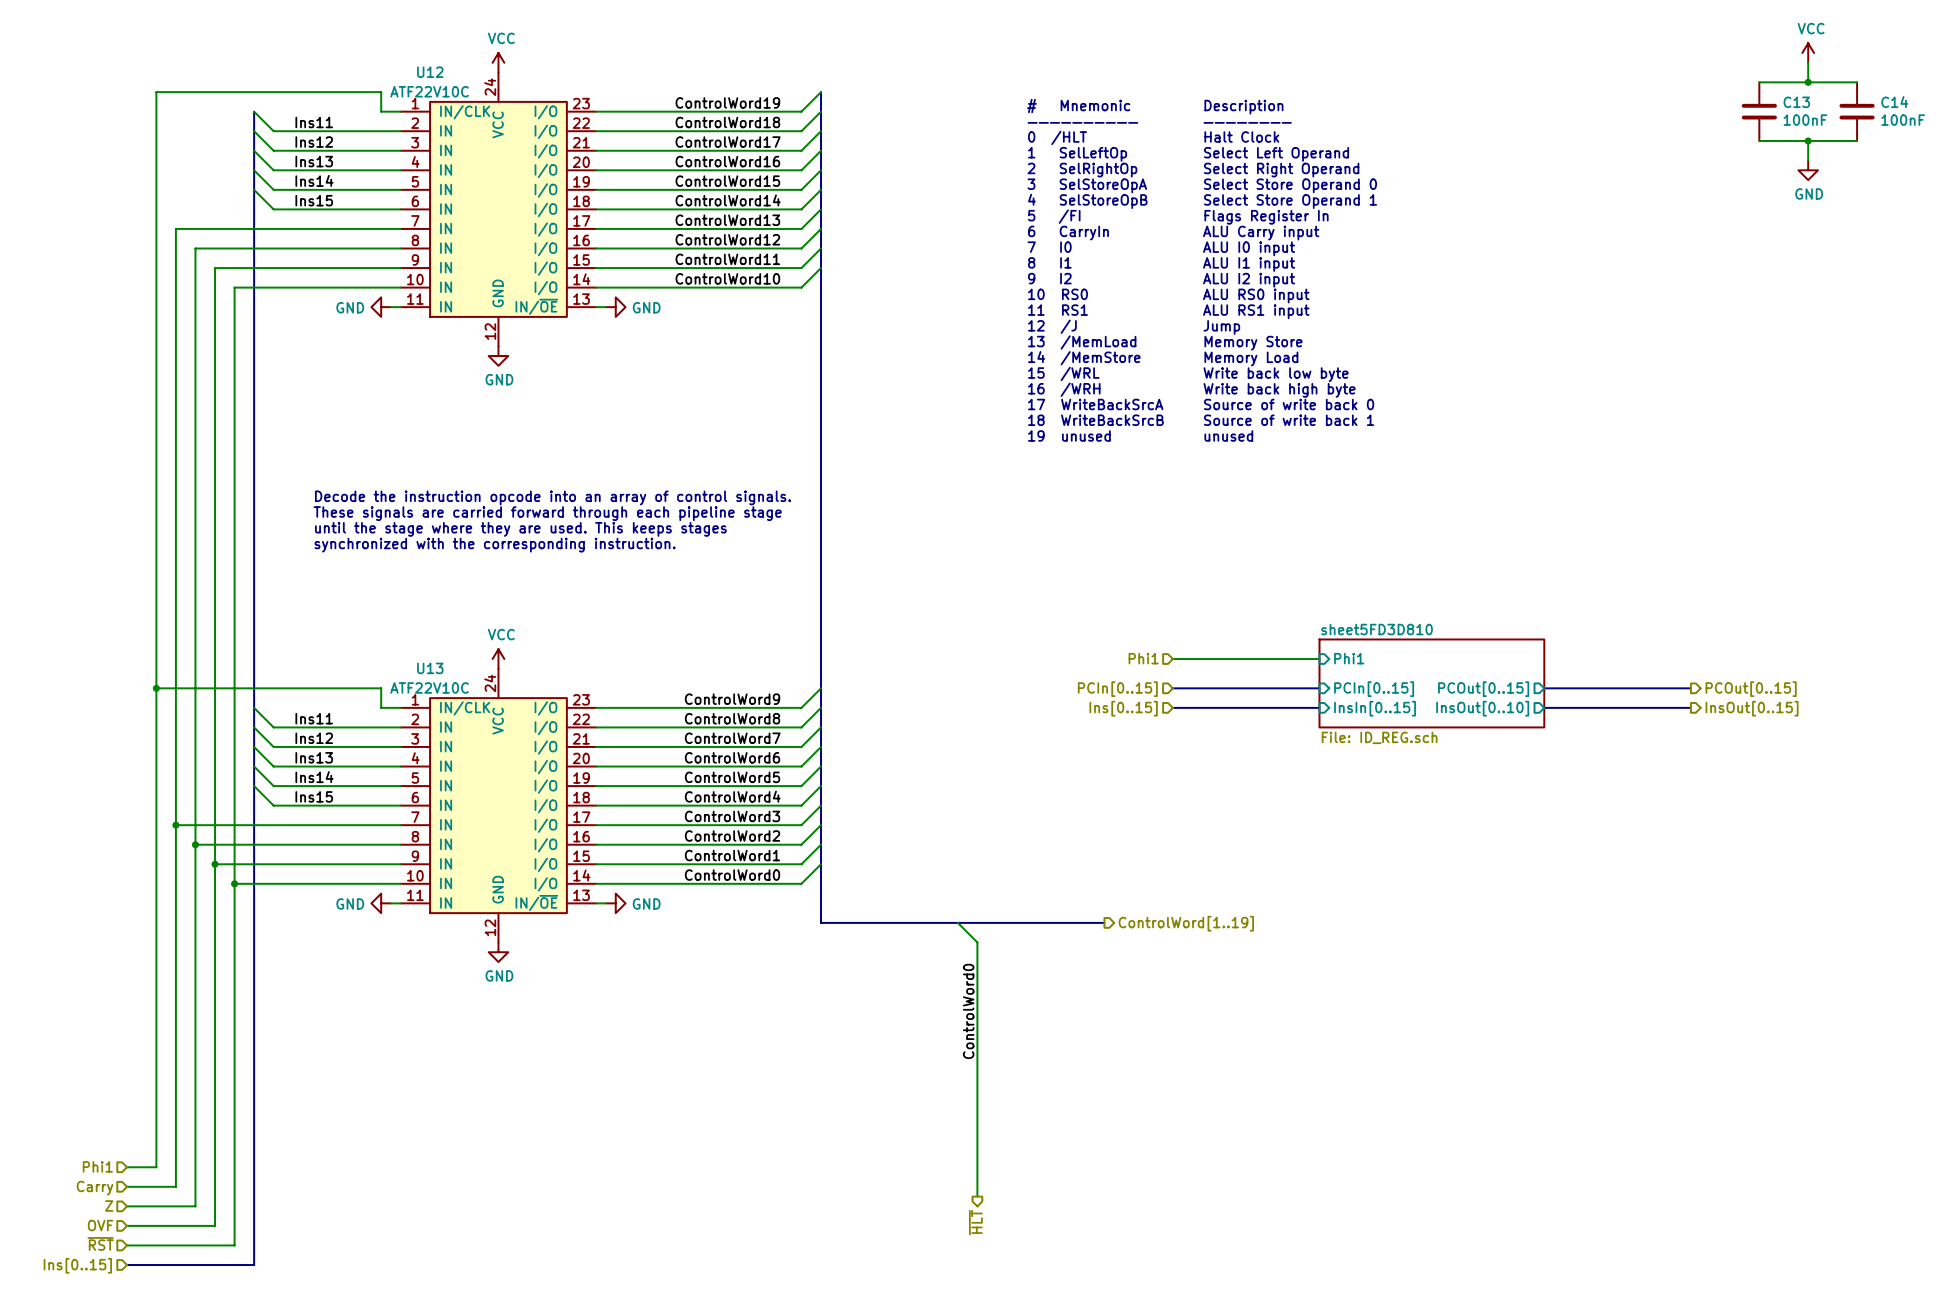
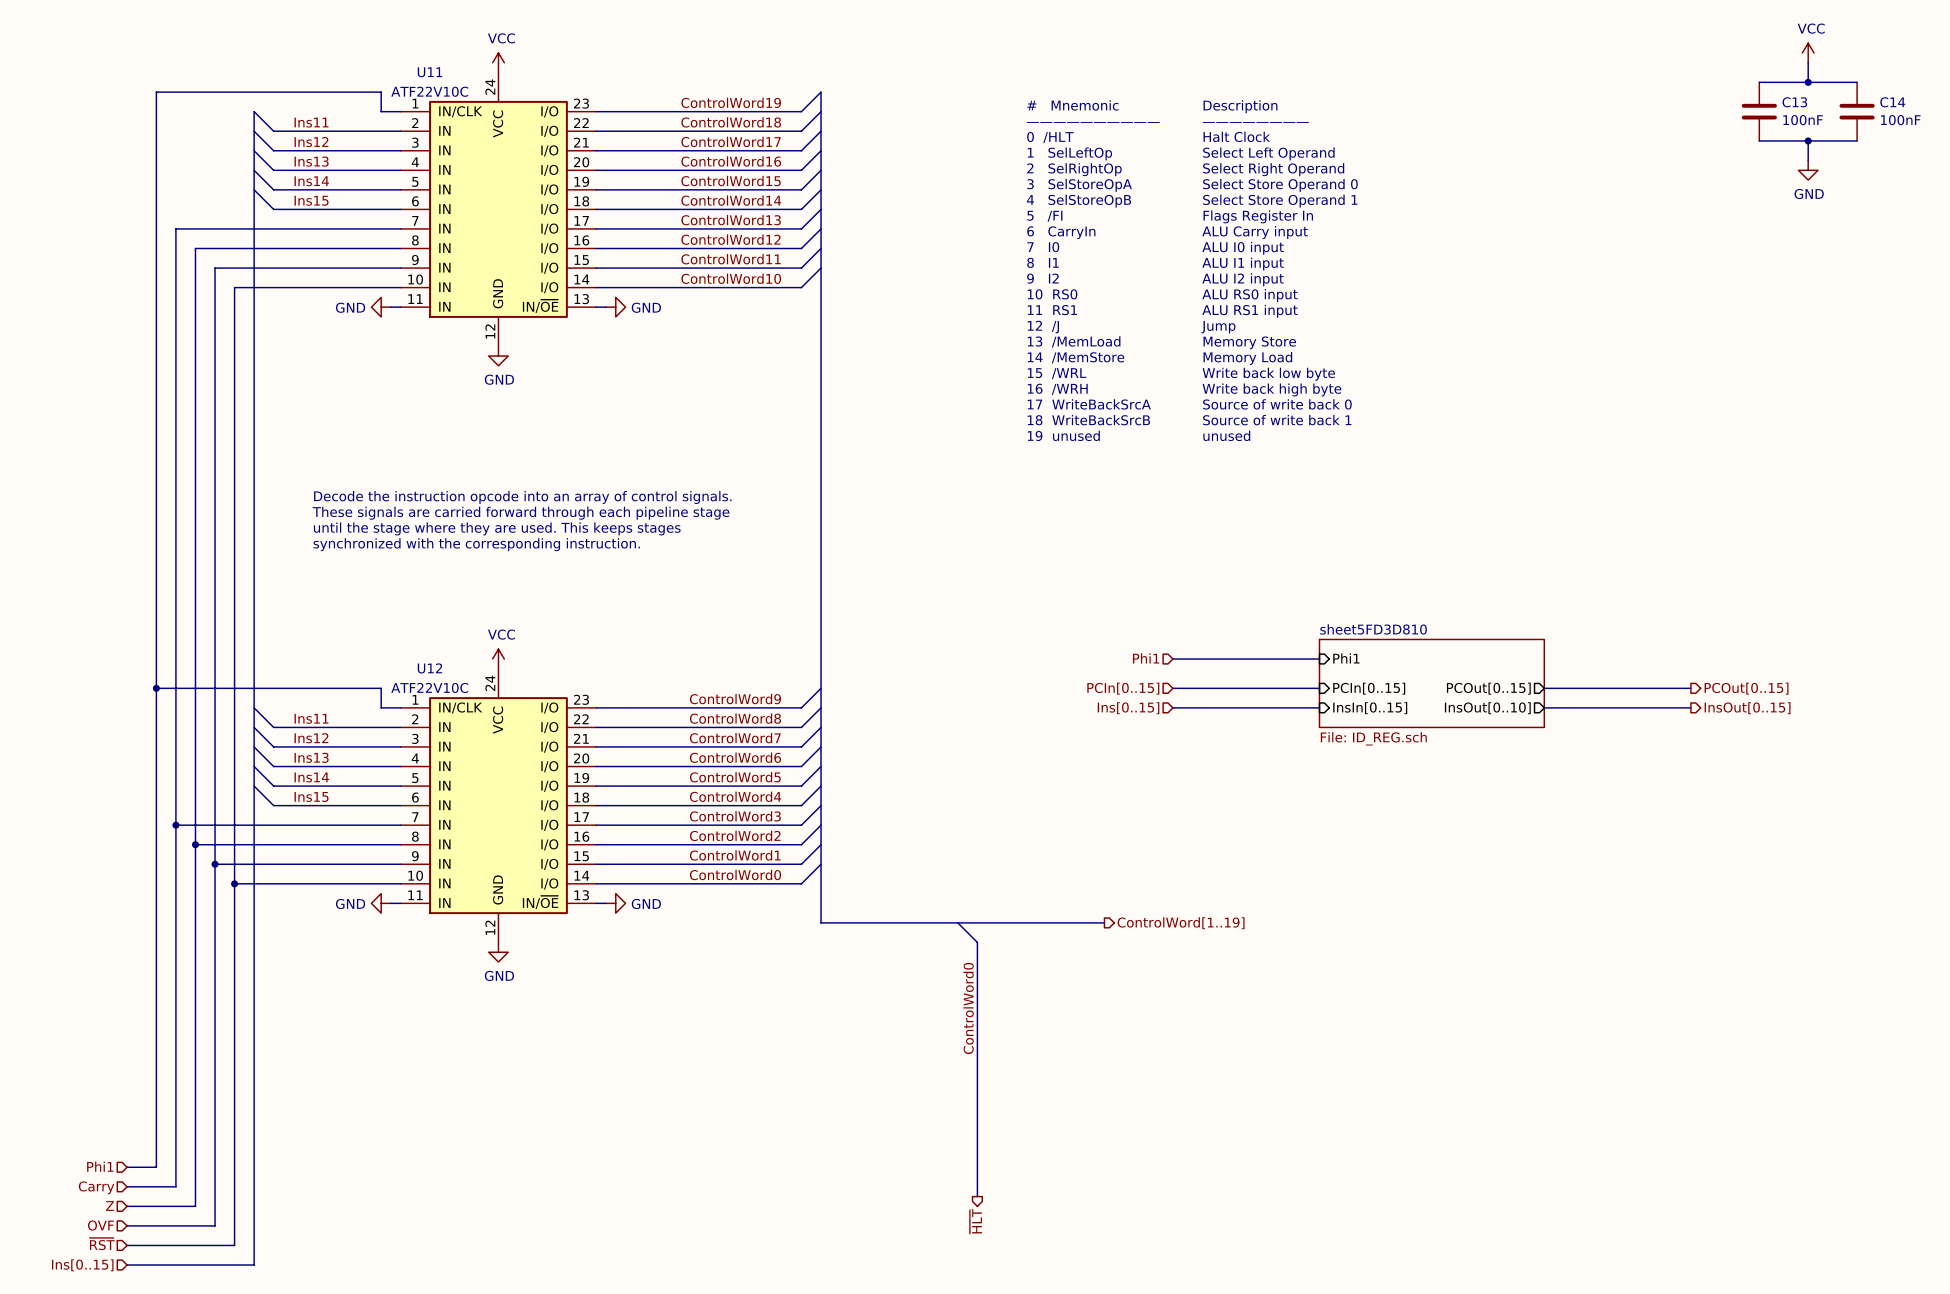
U12 name: U12 (430, 72) -> U11 (430, 72)
U13 name: U13 (430, 668) -> U12 (429, 668)

